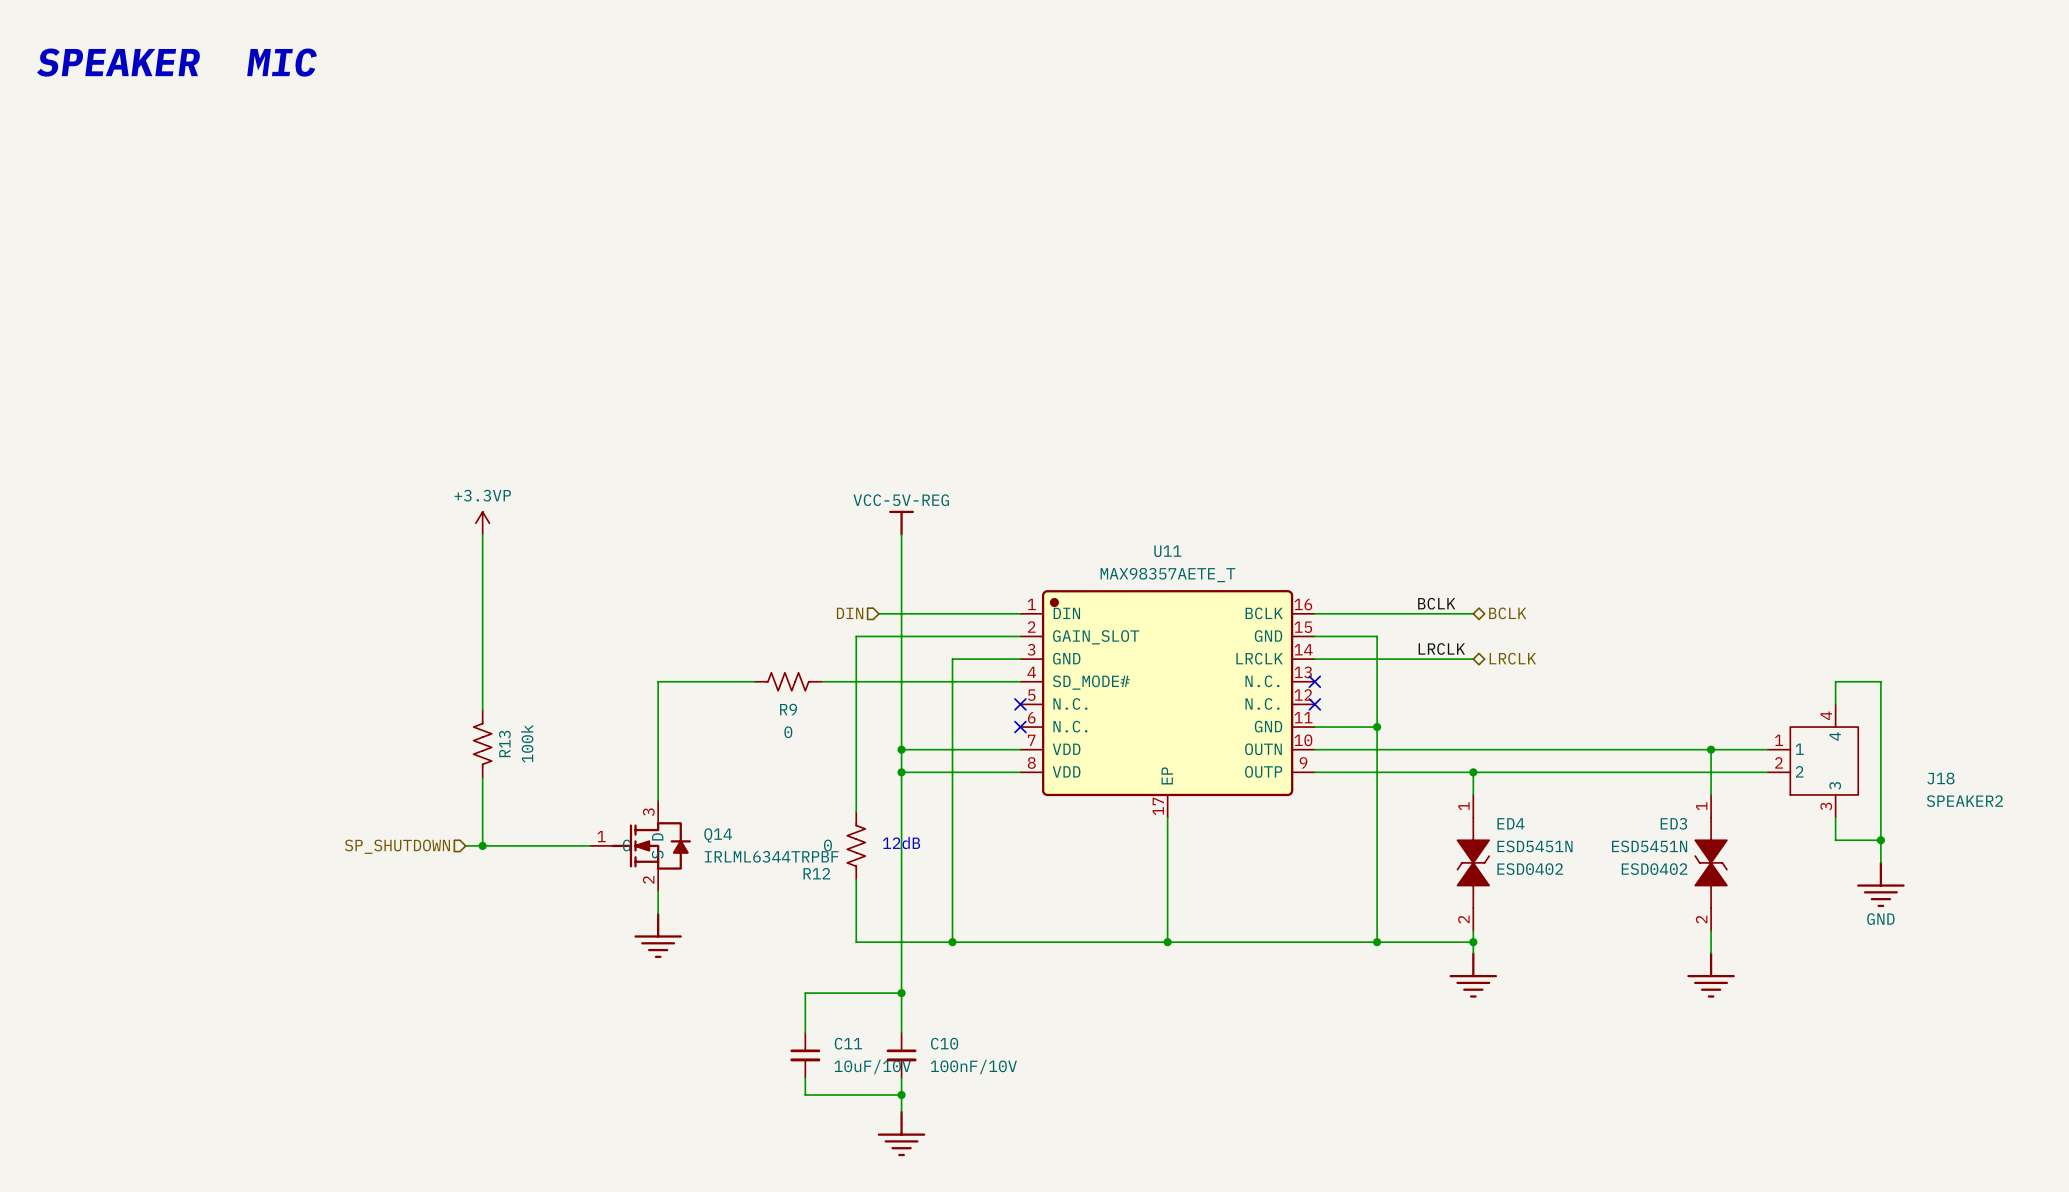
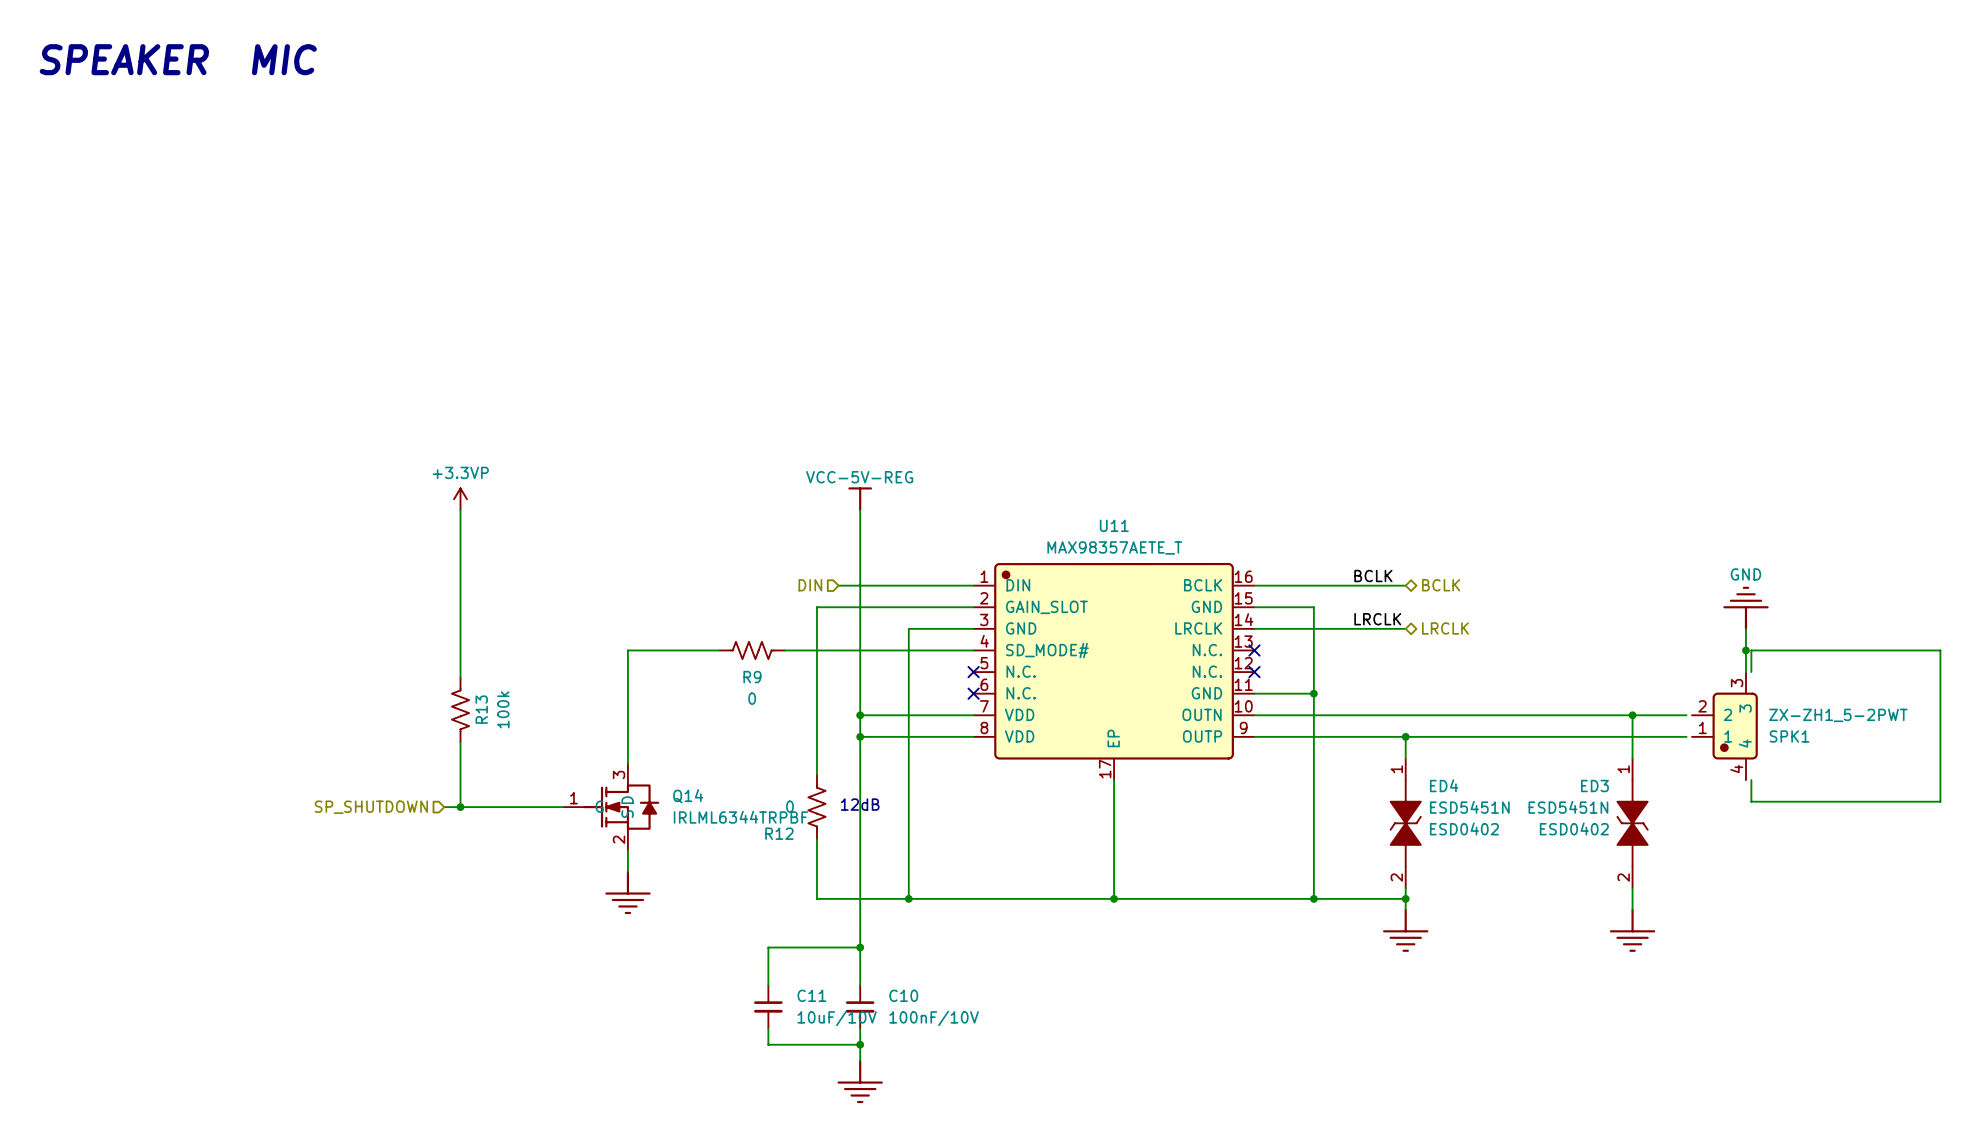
power symbol: none -> GND (1745, 608)
wire: none -> (1745, 628) (1745, 672)
junction: none -> (1745, 650)
wire: (1880, 681) (1880, 862) -> (1794, 650) (1940, 650) (1940, 801) (1794, 801)
SPK1: none -> ZX-ZH1_5-2PWT (1724, 726)
J18: SPEAKER2 (1812, 761) -> none
junction: (1880, 840) -> none
power symbol: GND (1880, 884) -> none

